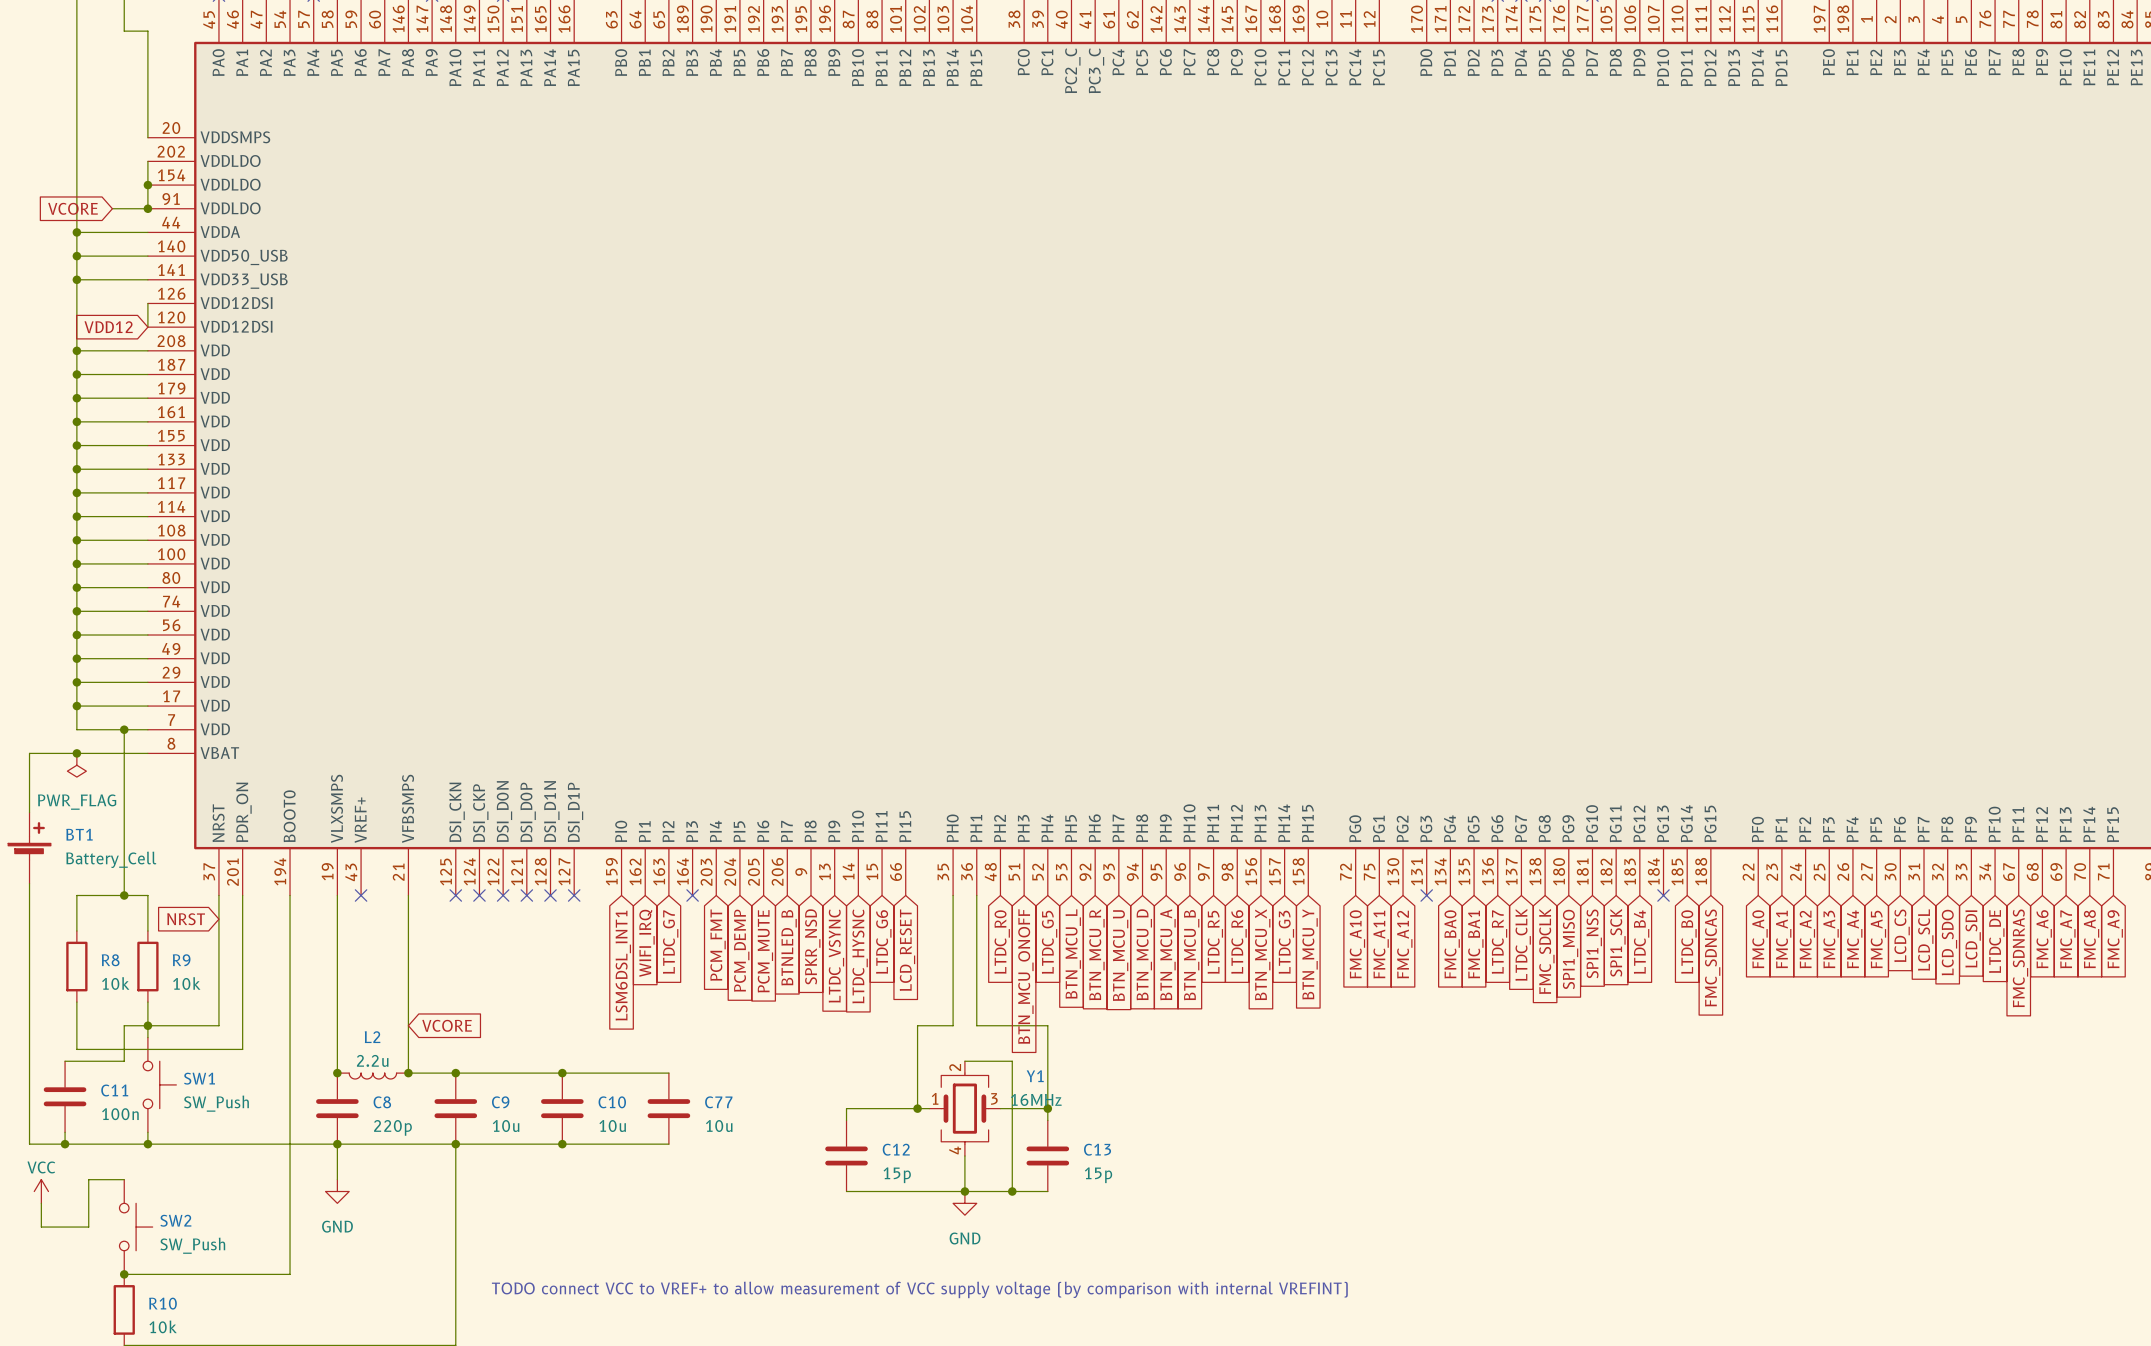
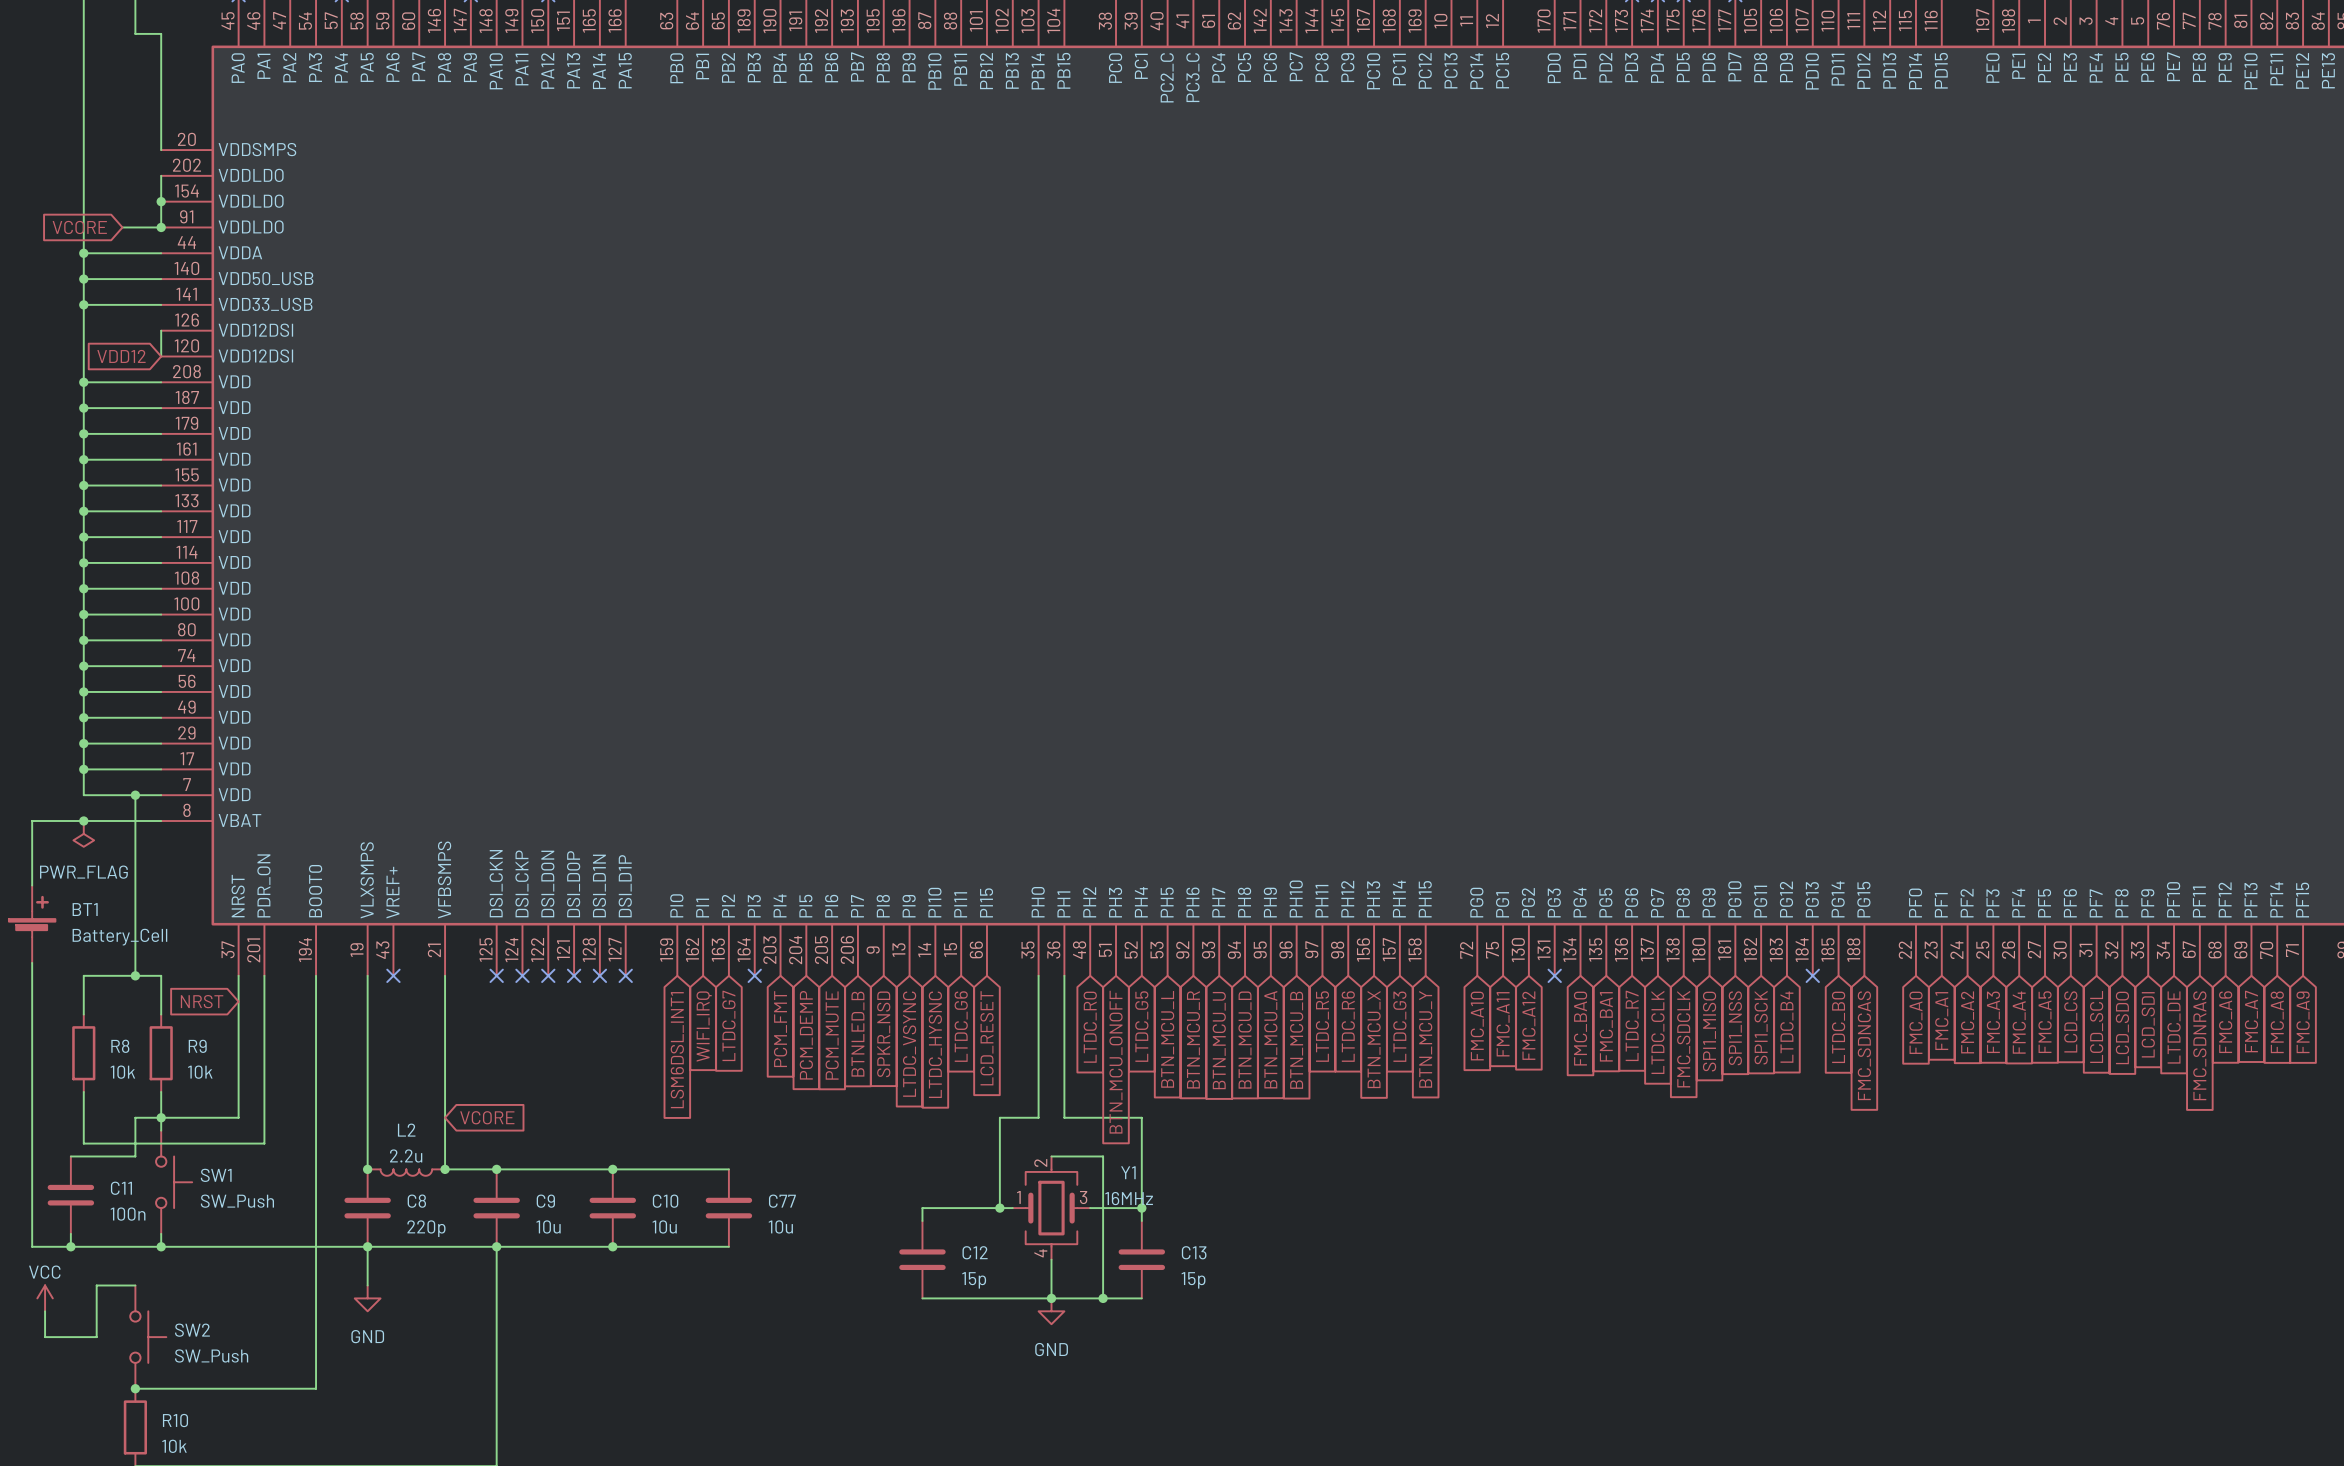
text: TODO connect VCC to VREF+ to allow measurement of VCC supply voltage (by comparison with internal VREFINT) (919, 1289) -> none

